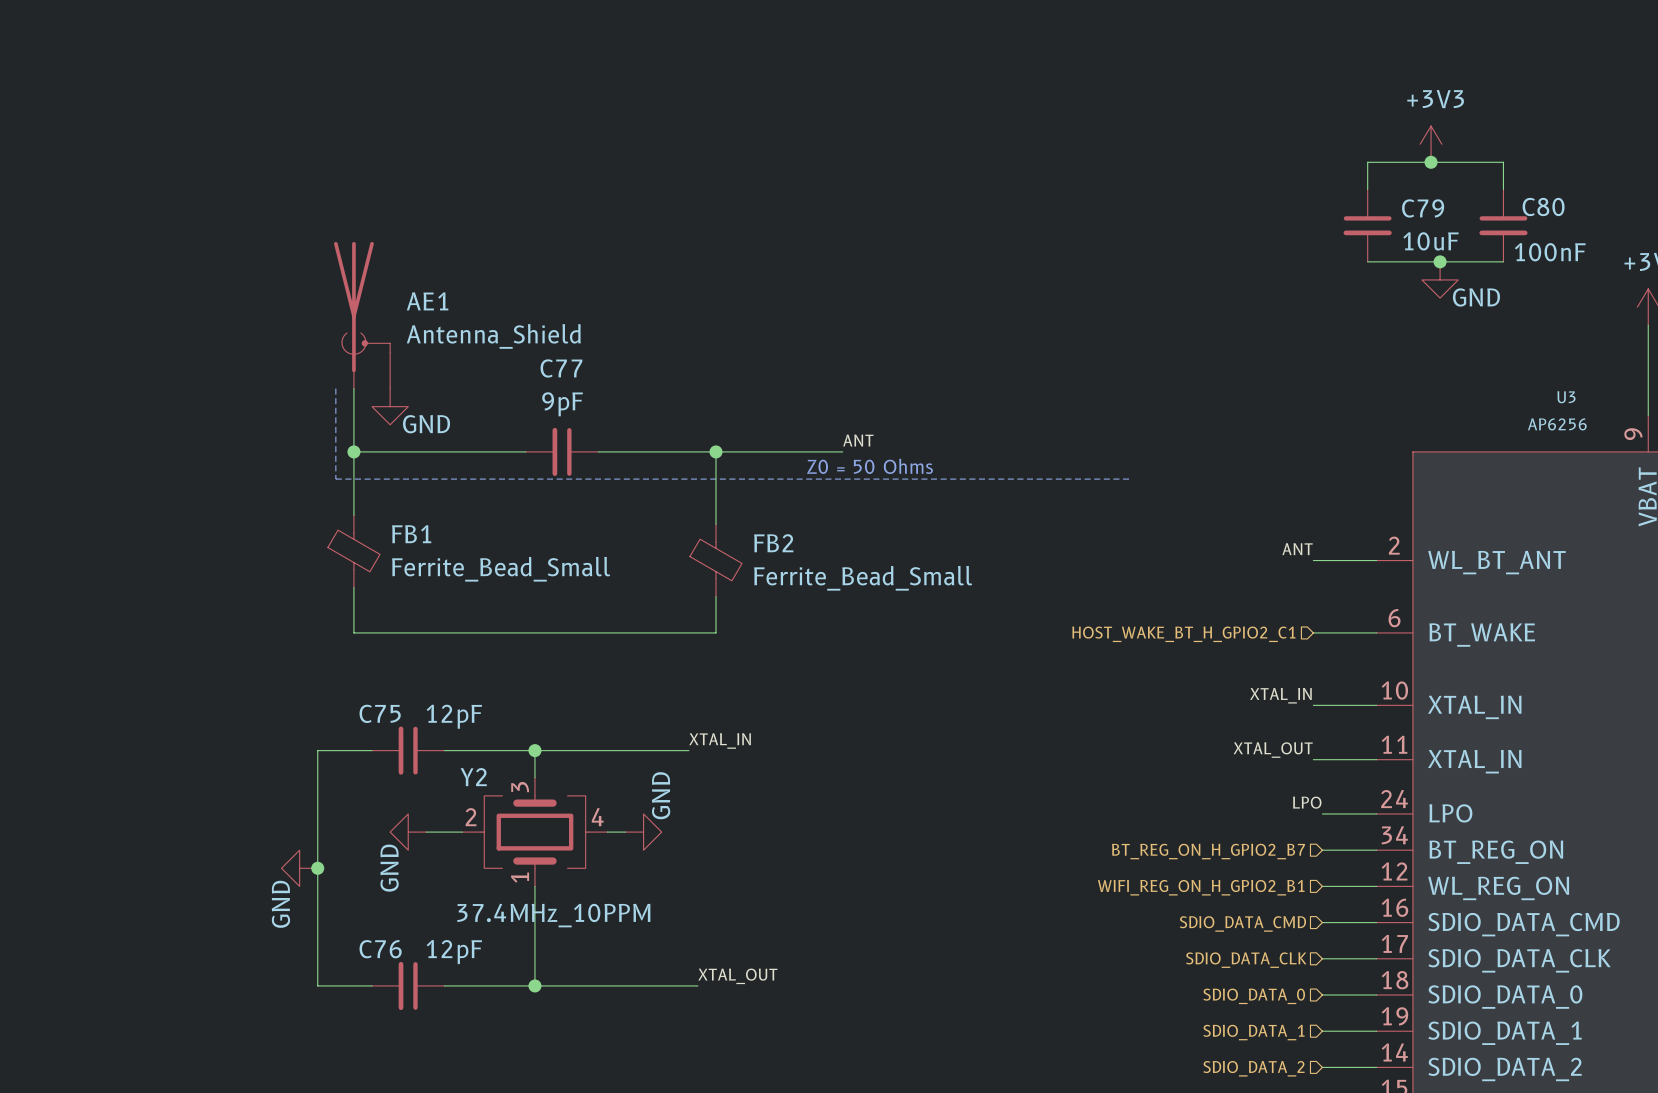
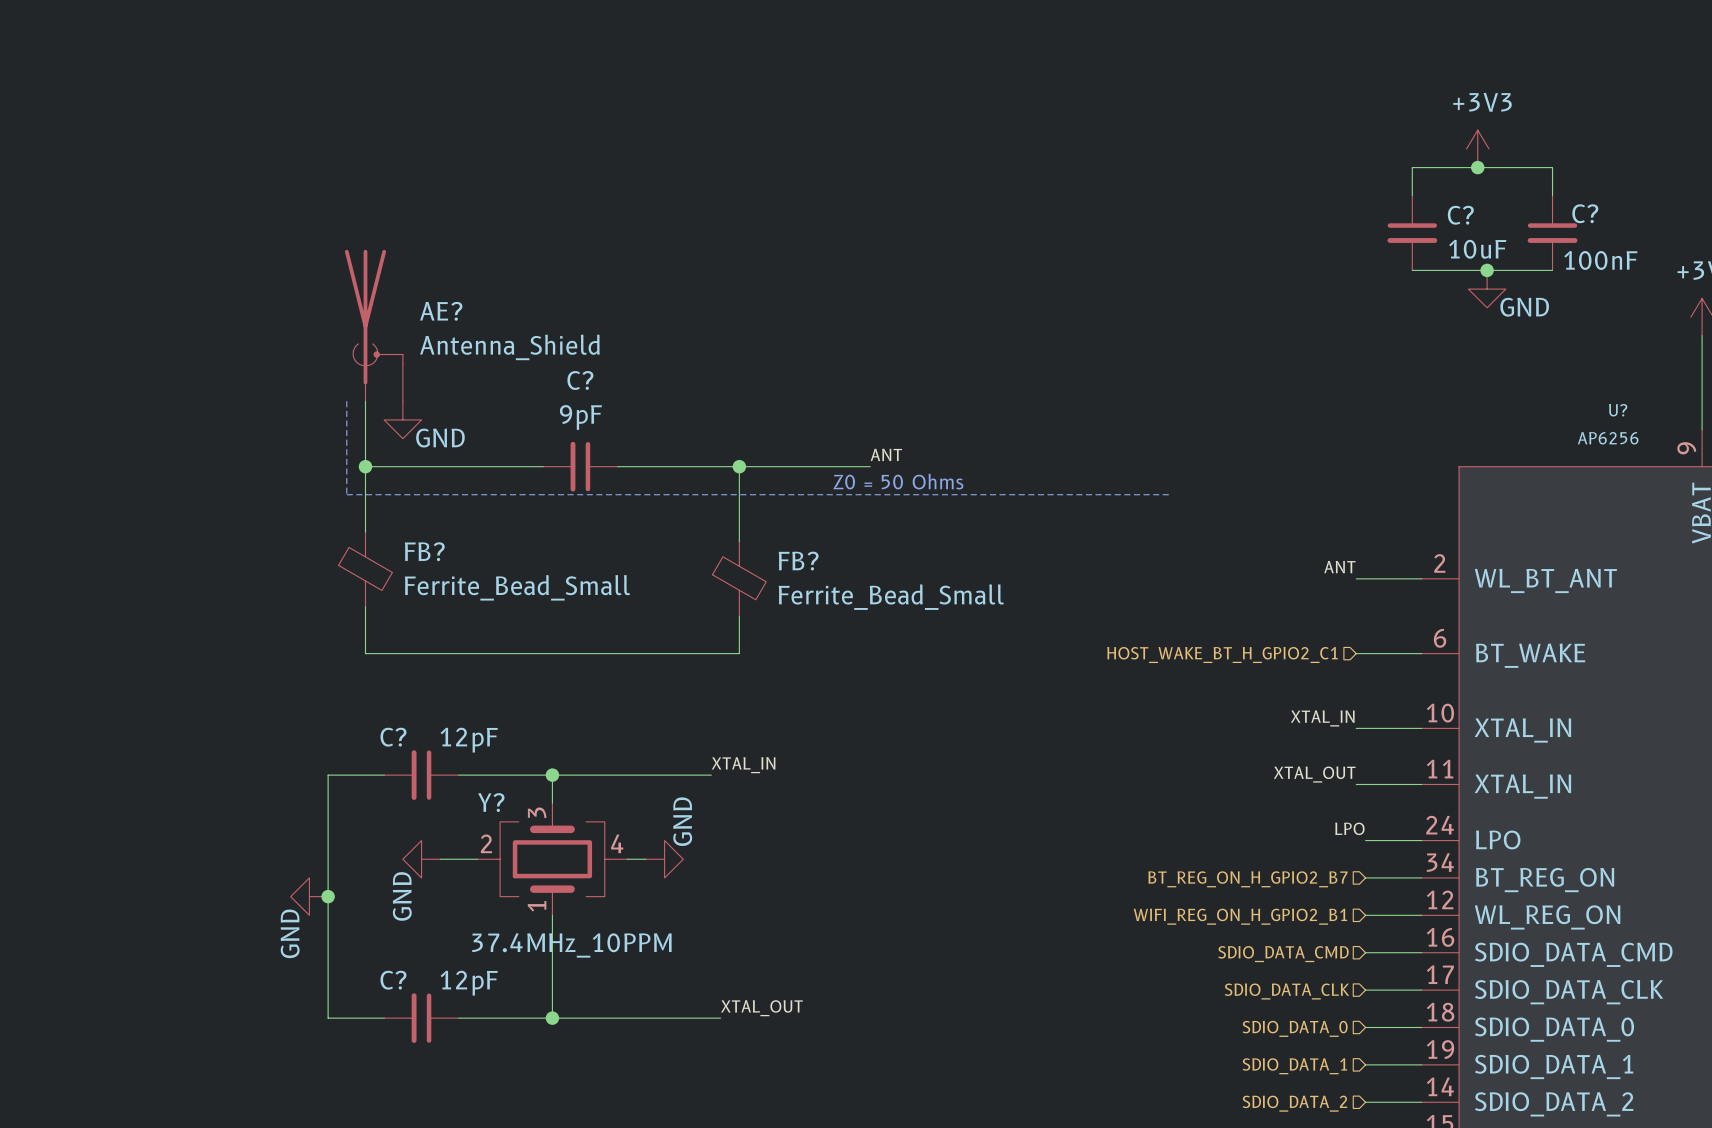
C80 name: C80 (1543, 206) -> C? (1585, 213)
C79 name: C79 (1423, 208) -> C? (1460, 215)
AE1 name: AE1 (427, 301) -> AE? (441, 311)
C77 name: C77 (561, 368) -> C? (580, 380)
U3 name: U3 (1566, 397) -> U? (1618, 410)
FB1 name: FB1 (411, 534) -> FB? (424, 551)
FB2 name: FB2 (773, 543) -> FB? (798, 561)
C75 name: C75 (380, 713) -> C? (393, 737)
Y2 name: Y2 (473, 777) -> Y? (491, 802)
C76 name: C76 (380, 949) -> C? (393, 980)

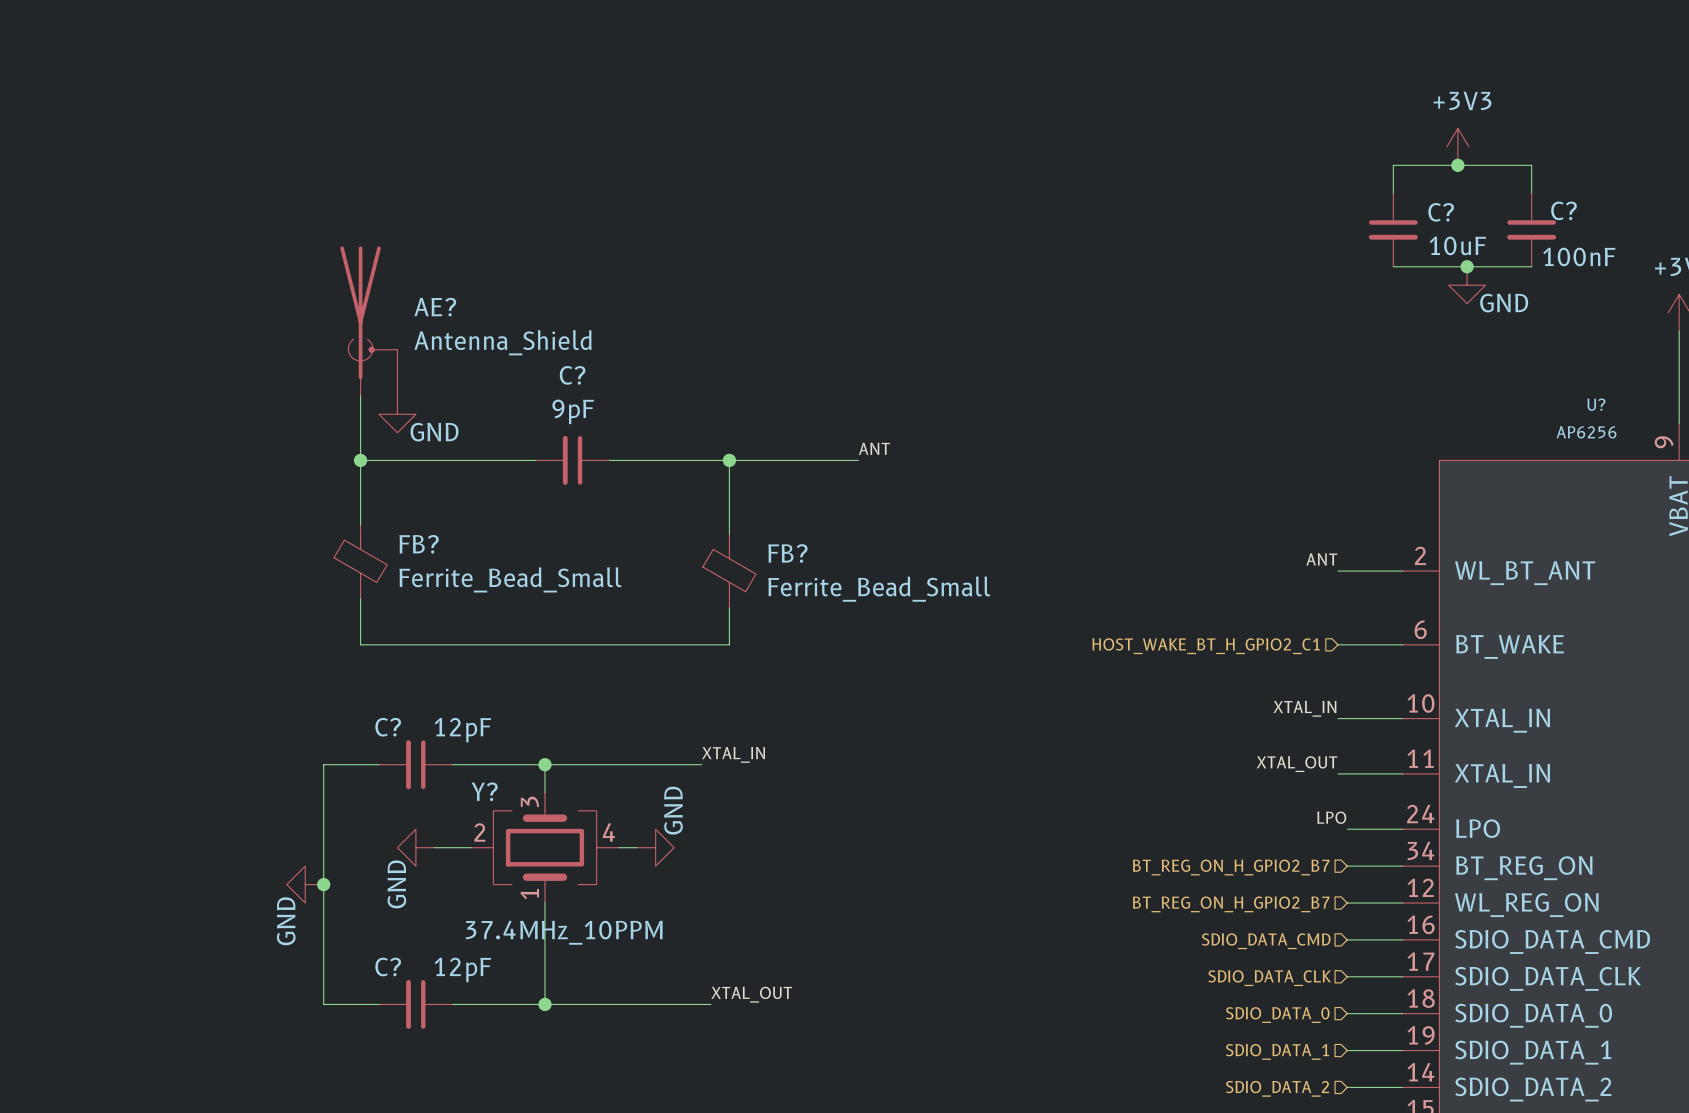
line: (346, 401) (346, 494) (1169, 494) -> none
text: Z0 = 50 Ohms (898, 481) -> none
hierarchical label: WIFI_REG_ON_H_GPIO2_B1 (1240, 916) -> BT_REG_ON_H_GPIO2_B7 (1231, 904)

